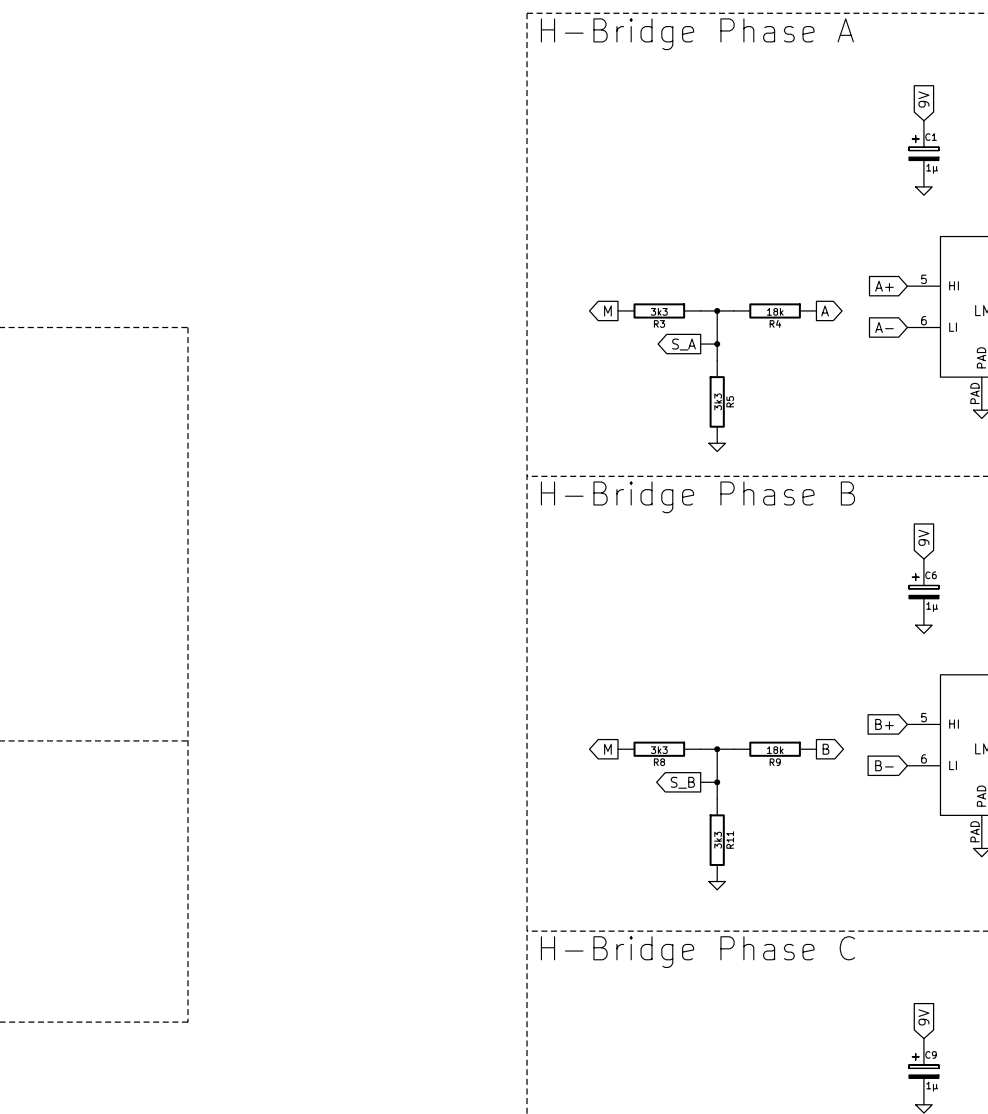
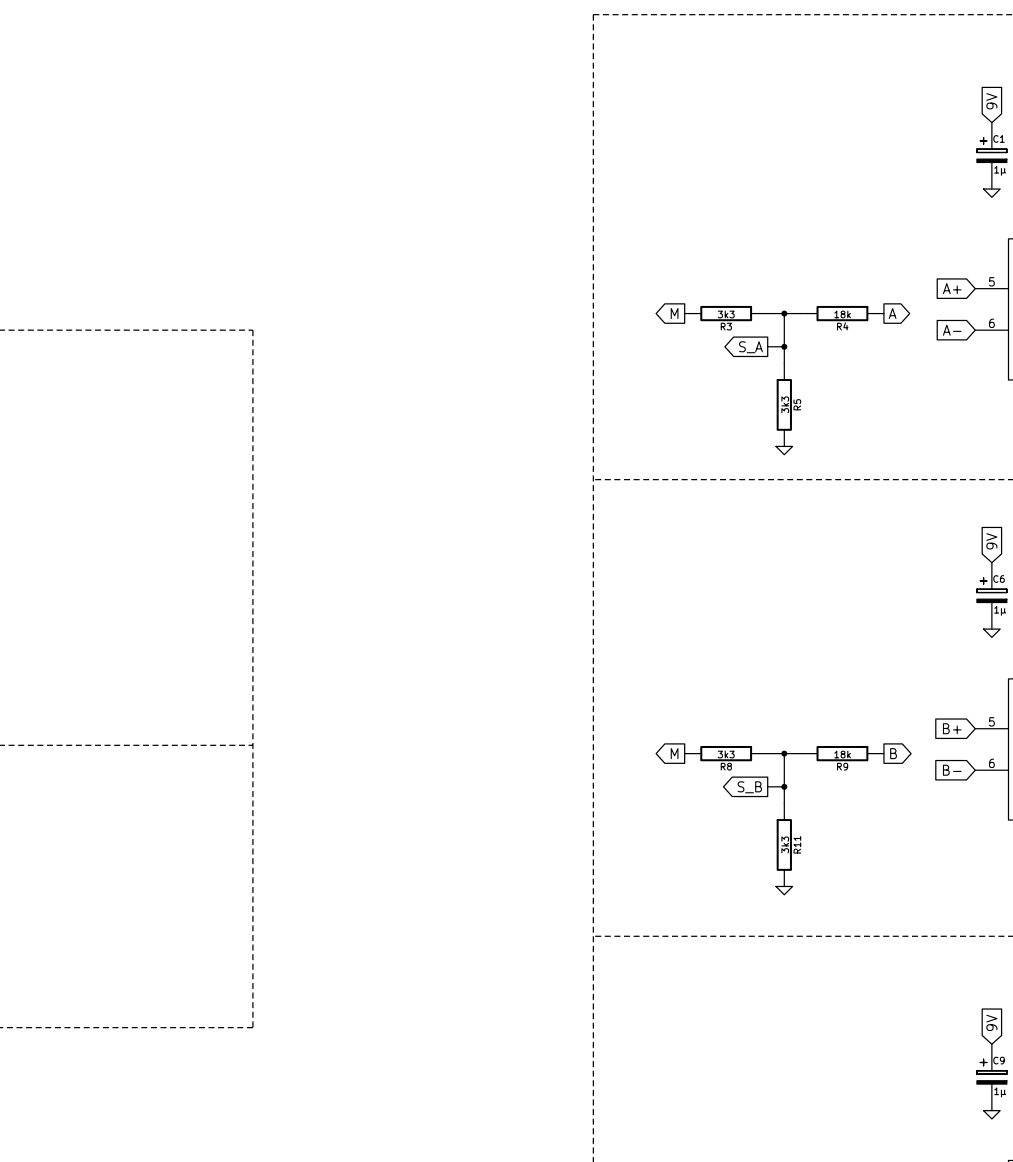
text: H-Bridge Phase A (697, 34) -> none
text: H-Bridge Phase B (697, 497) -> none
text: H-Bridge Phase C (697, 952) -> none

